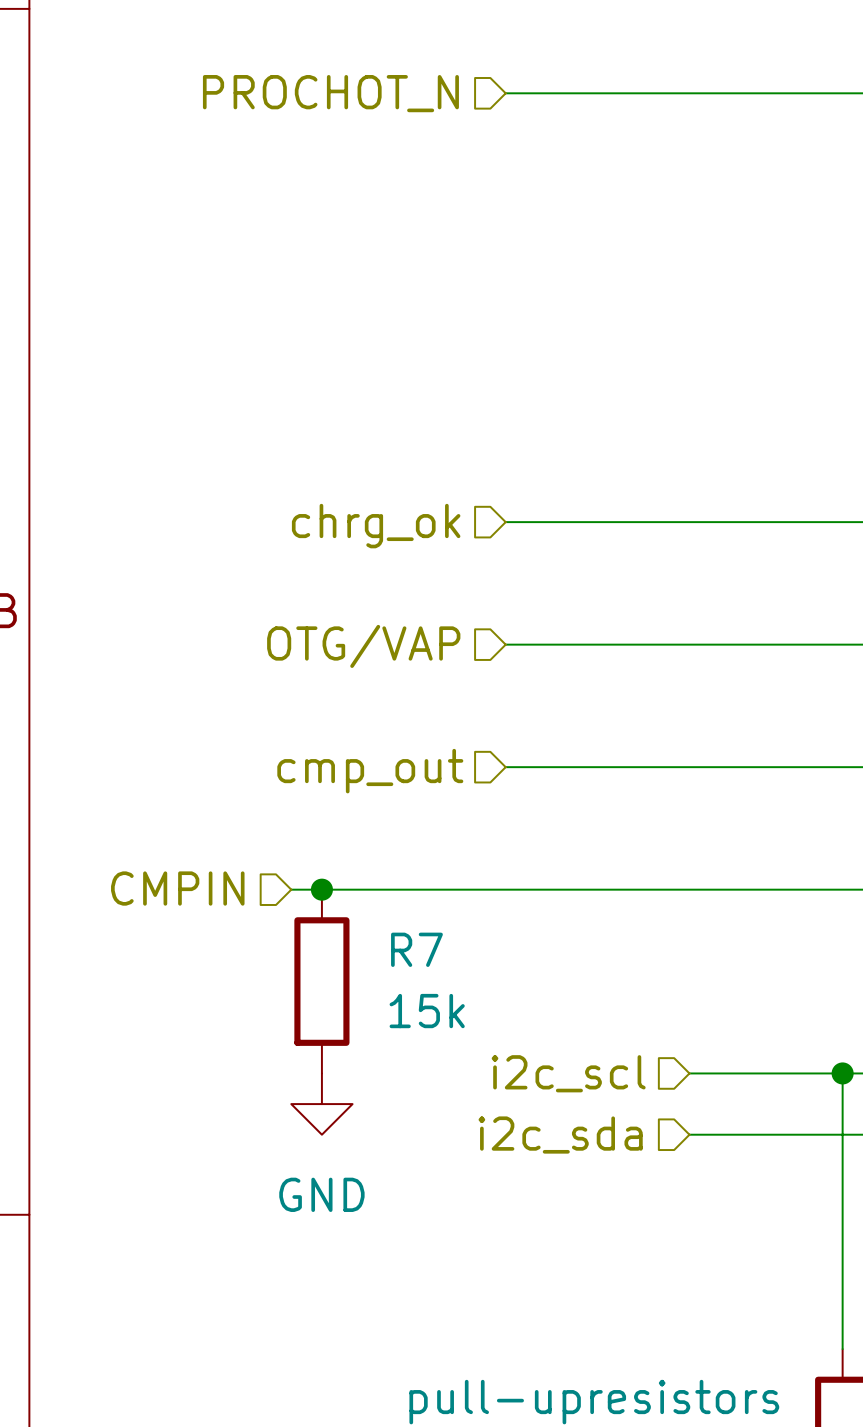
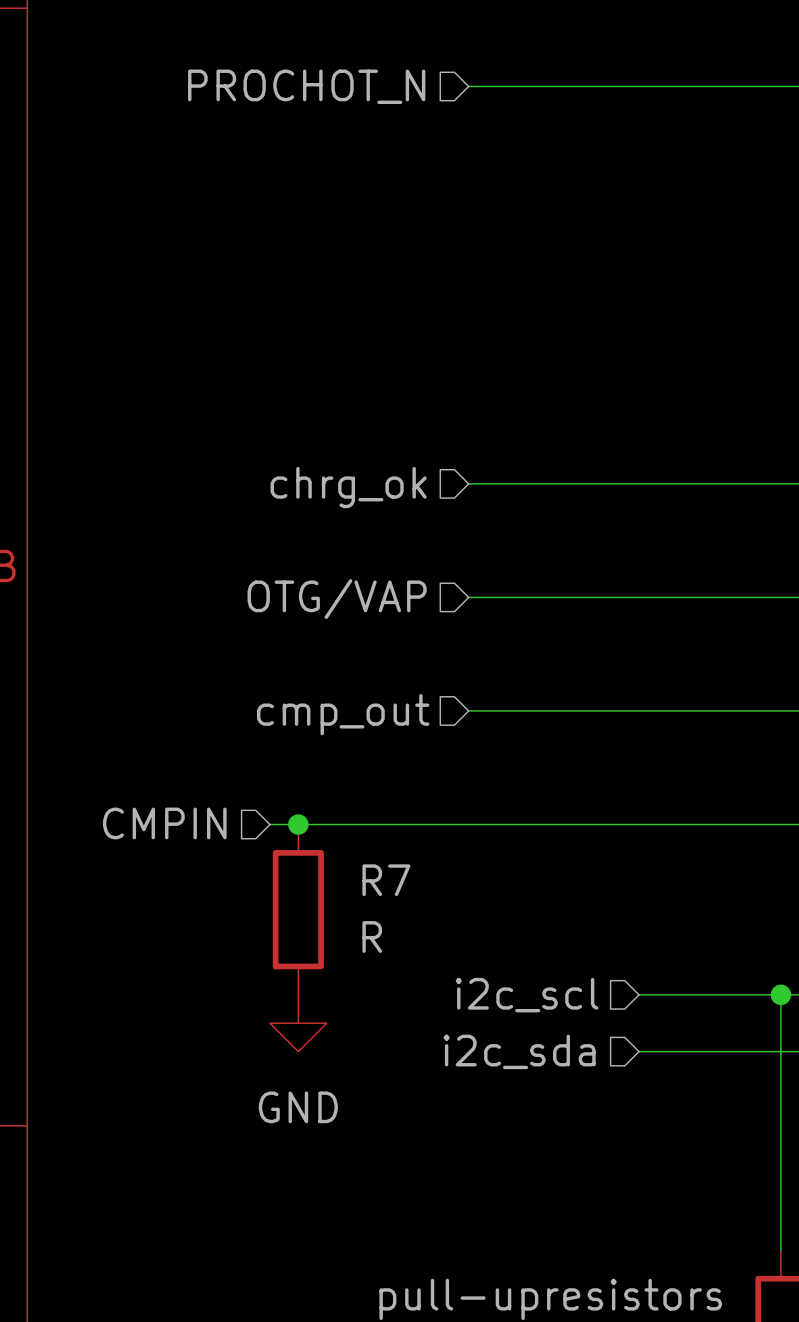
R7 value: 15k (427, 1011) -> R (372, 937)

